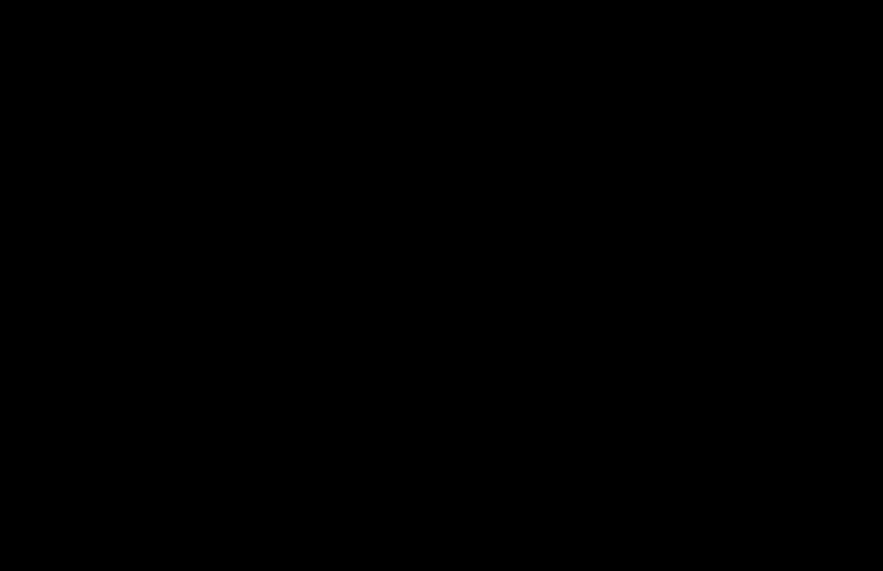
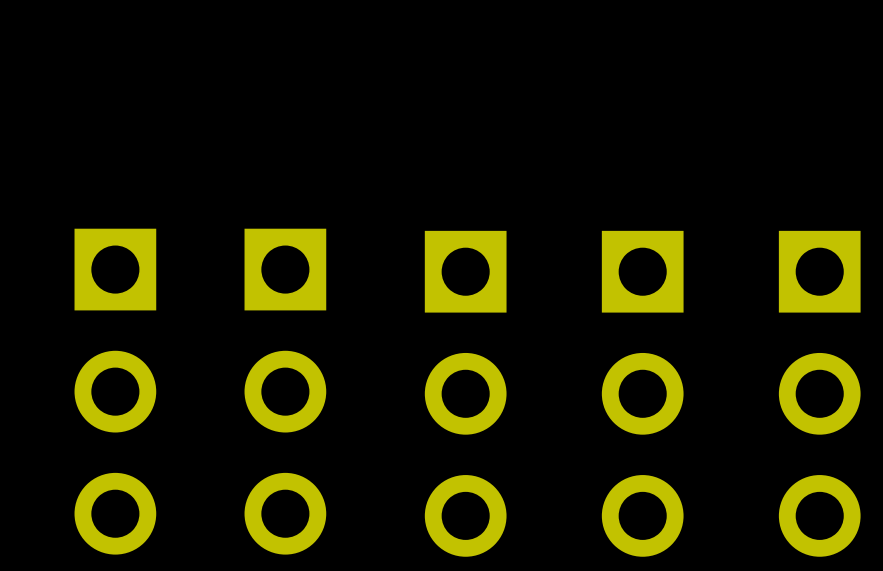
part: none -> (115, 391)
part: none -> (285, 391)
part: none -> (465, 393)
part: none -> (642, 393)
part: none -> (819, 393)

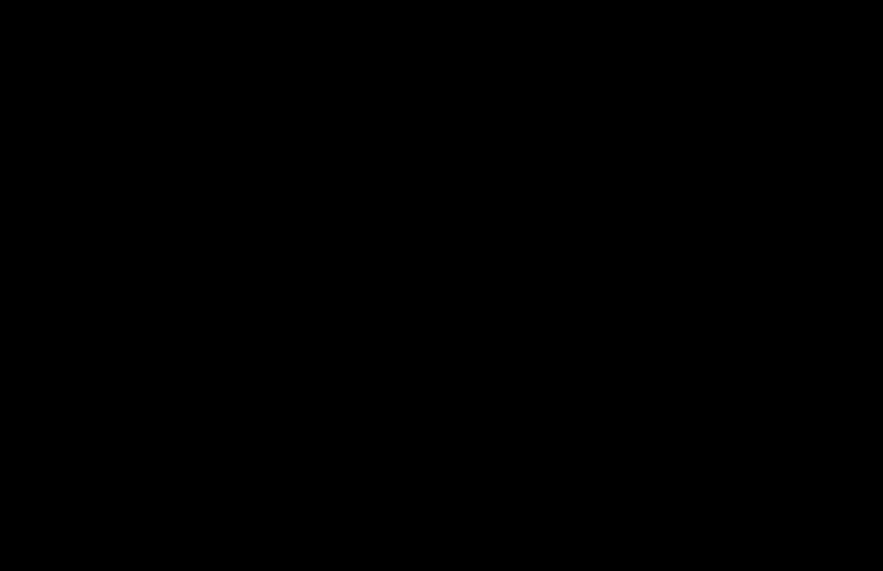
part: (115, 391) -> none
part: (285, 391) -> none
part: (465, 393) -> none
part: (642, 393) -> none
part: (819, 393) -> none

